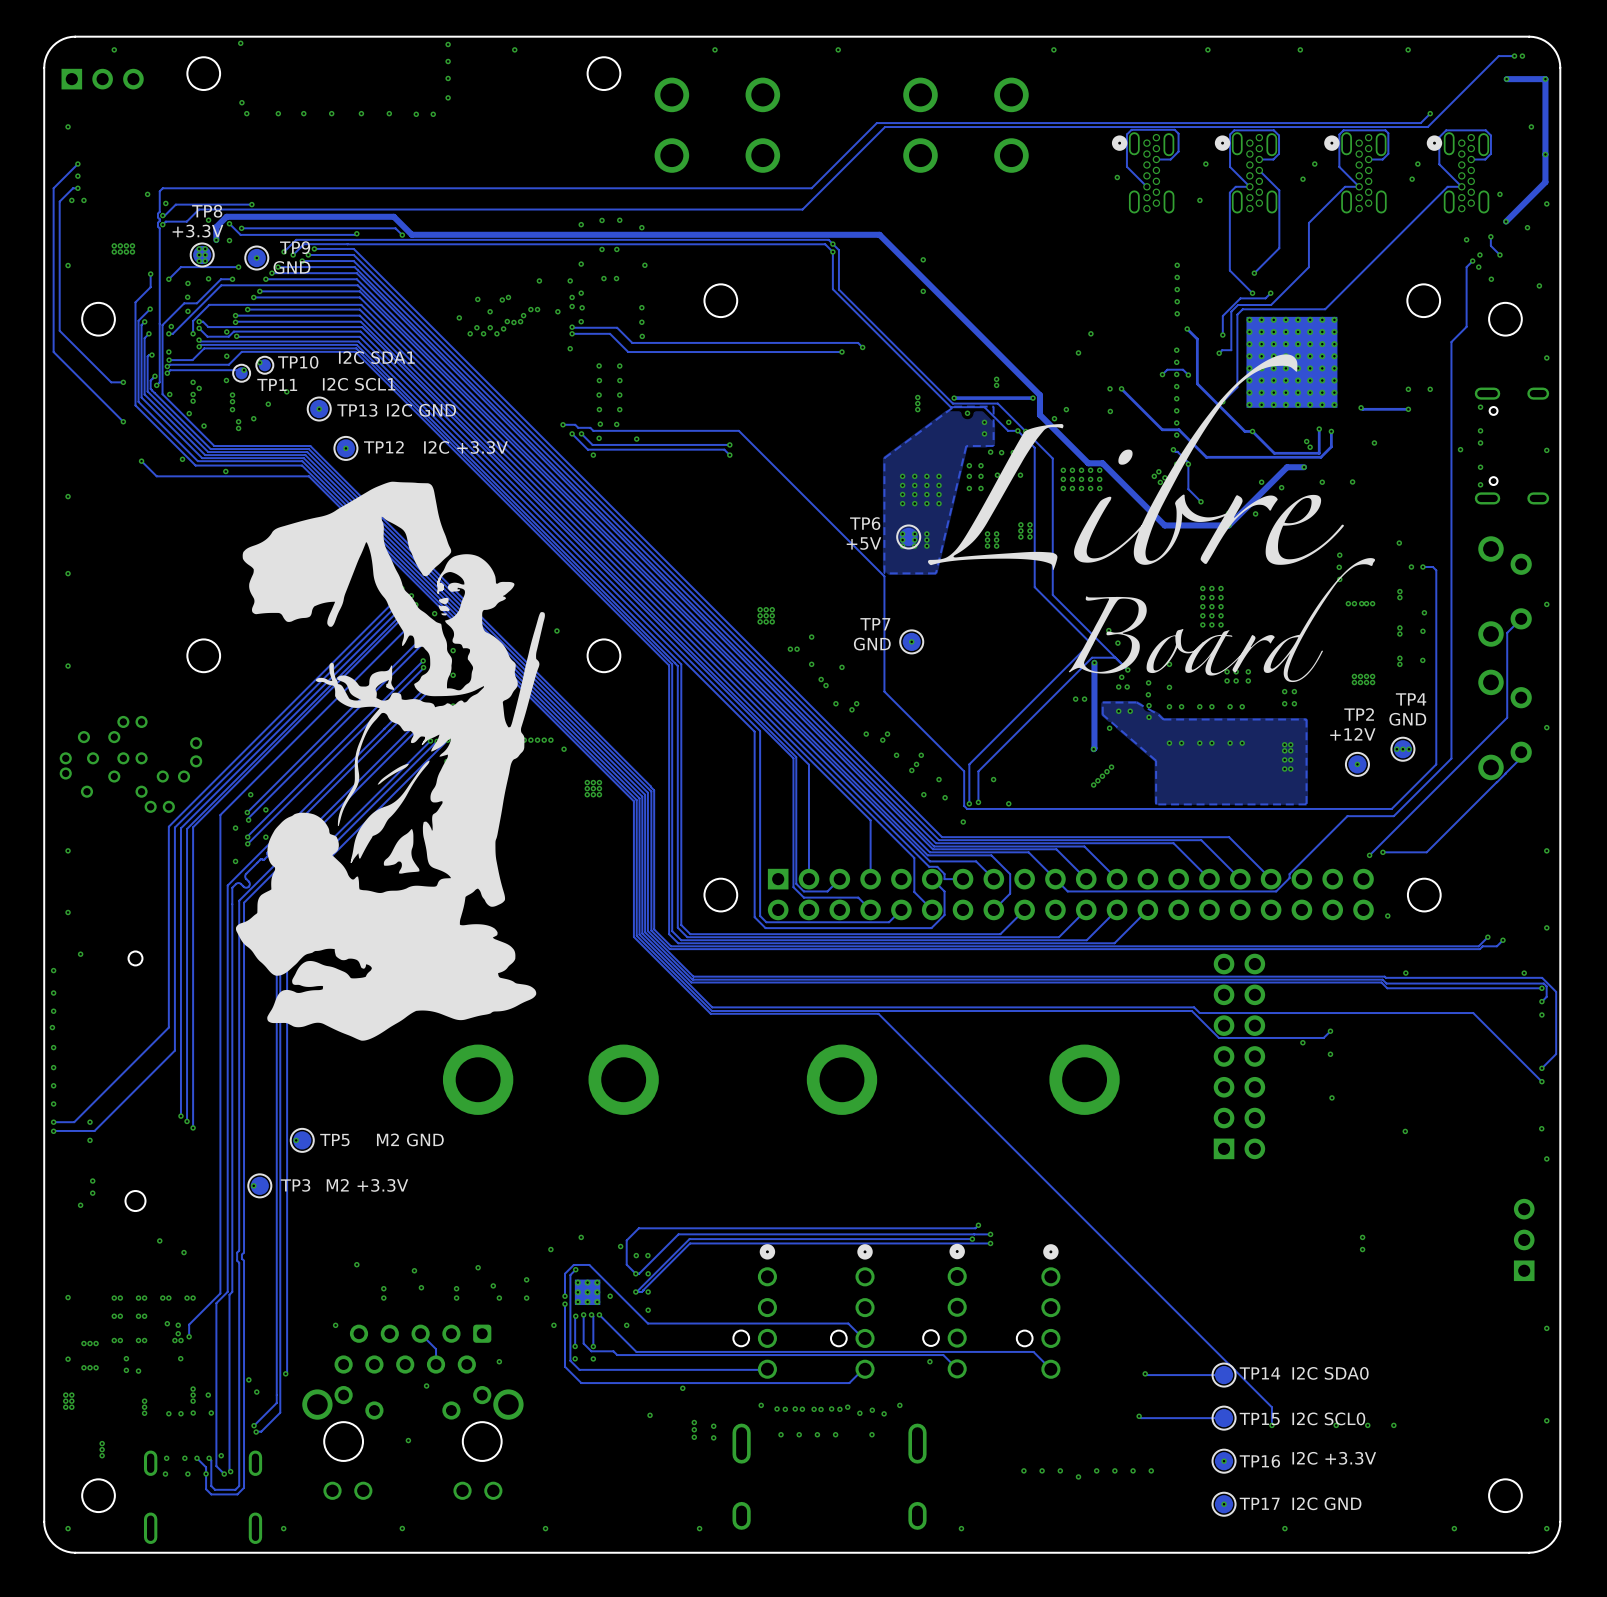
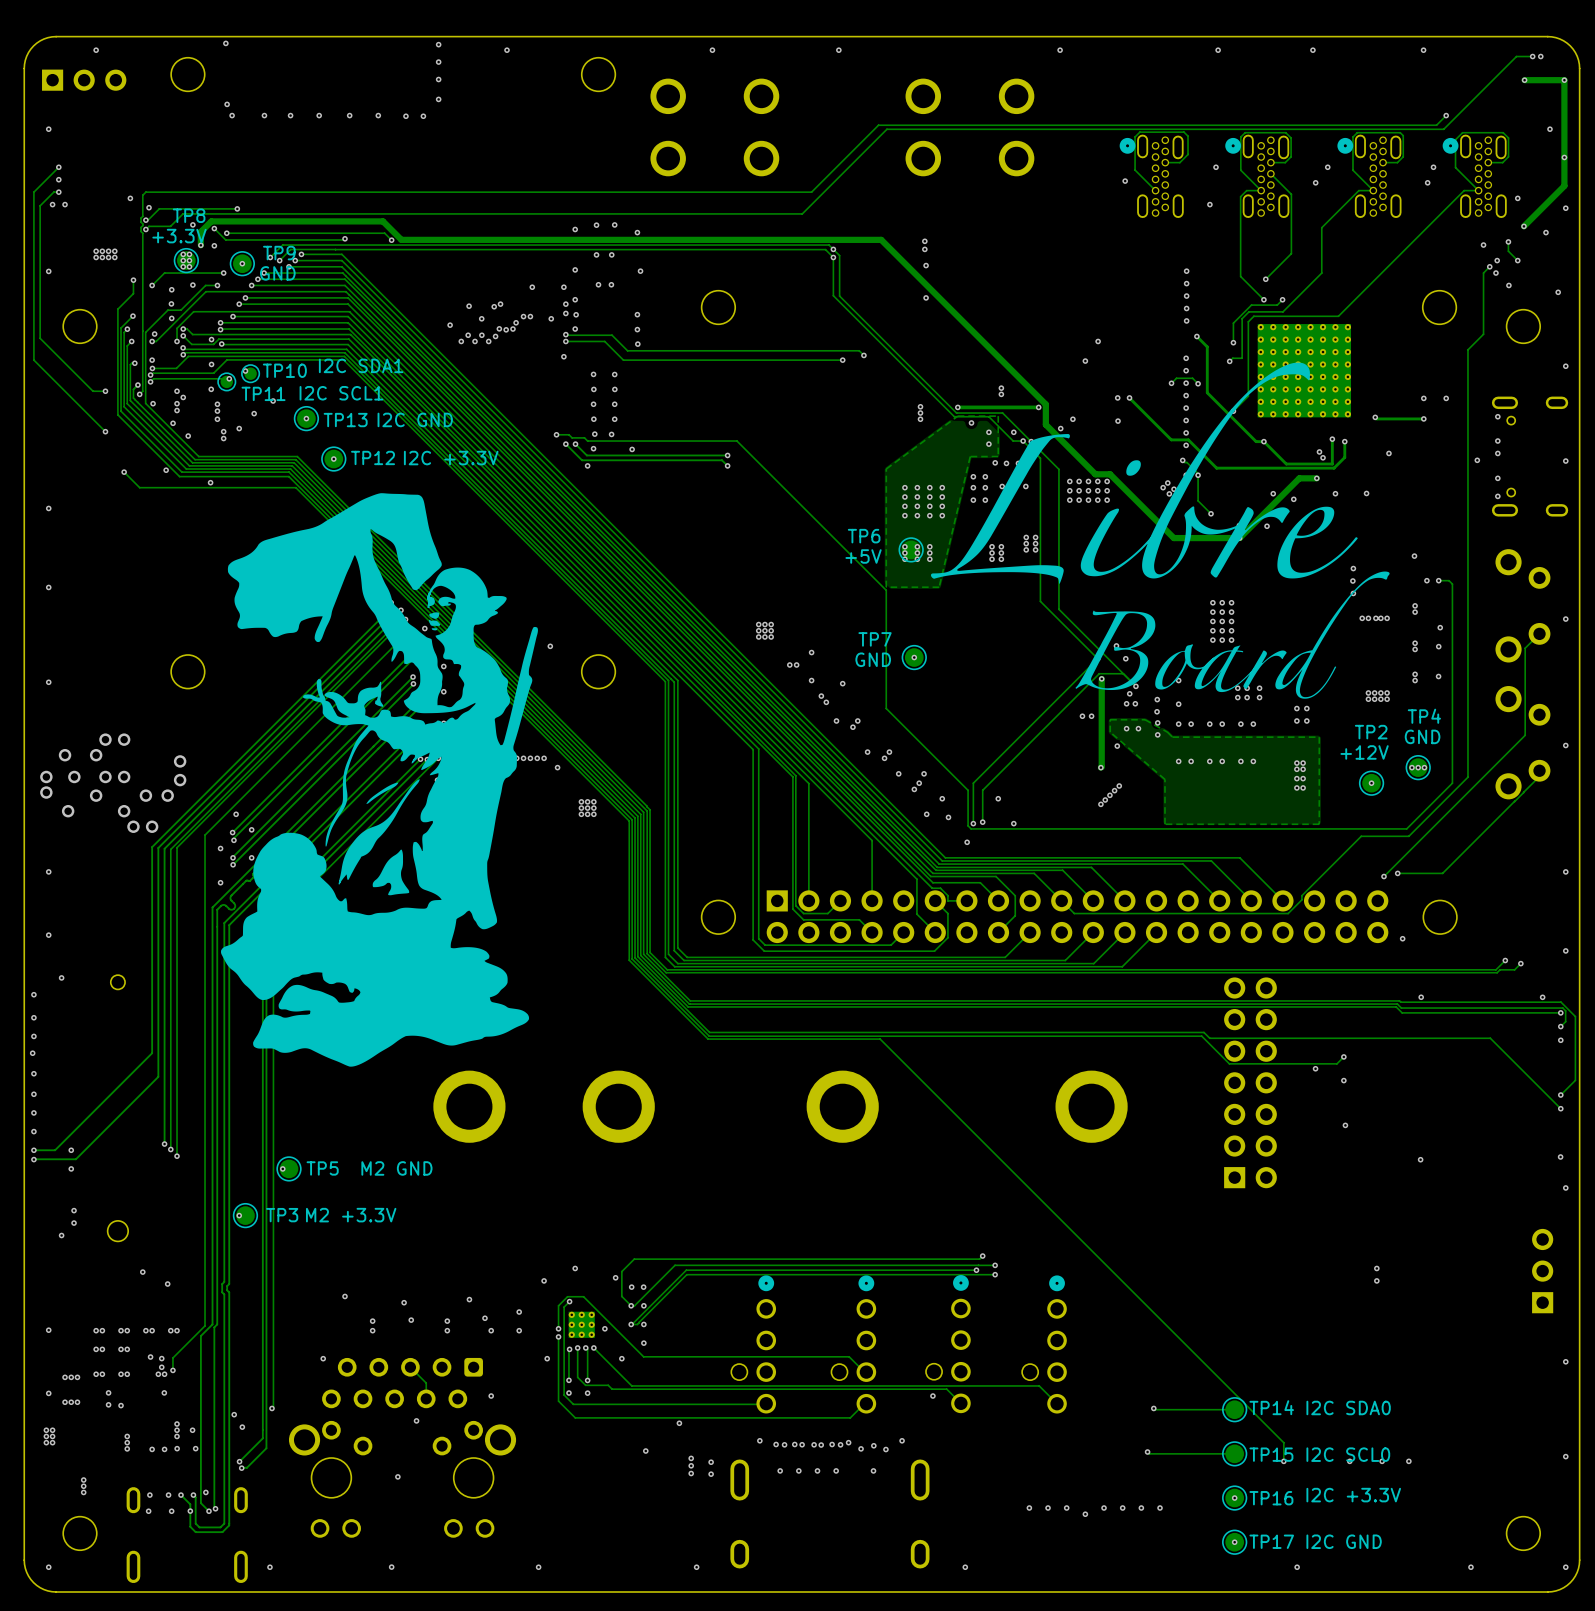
via: none -> (924, 241)
via: none -> (924, 249)

